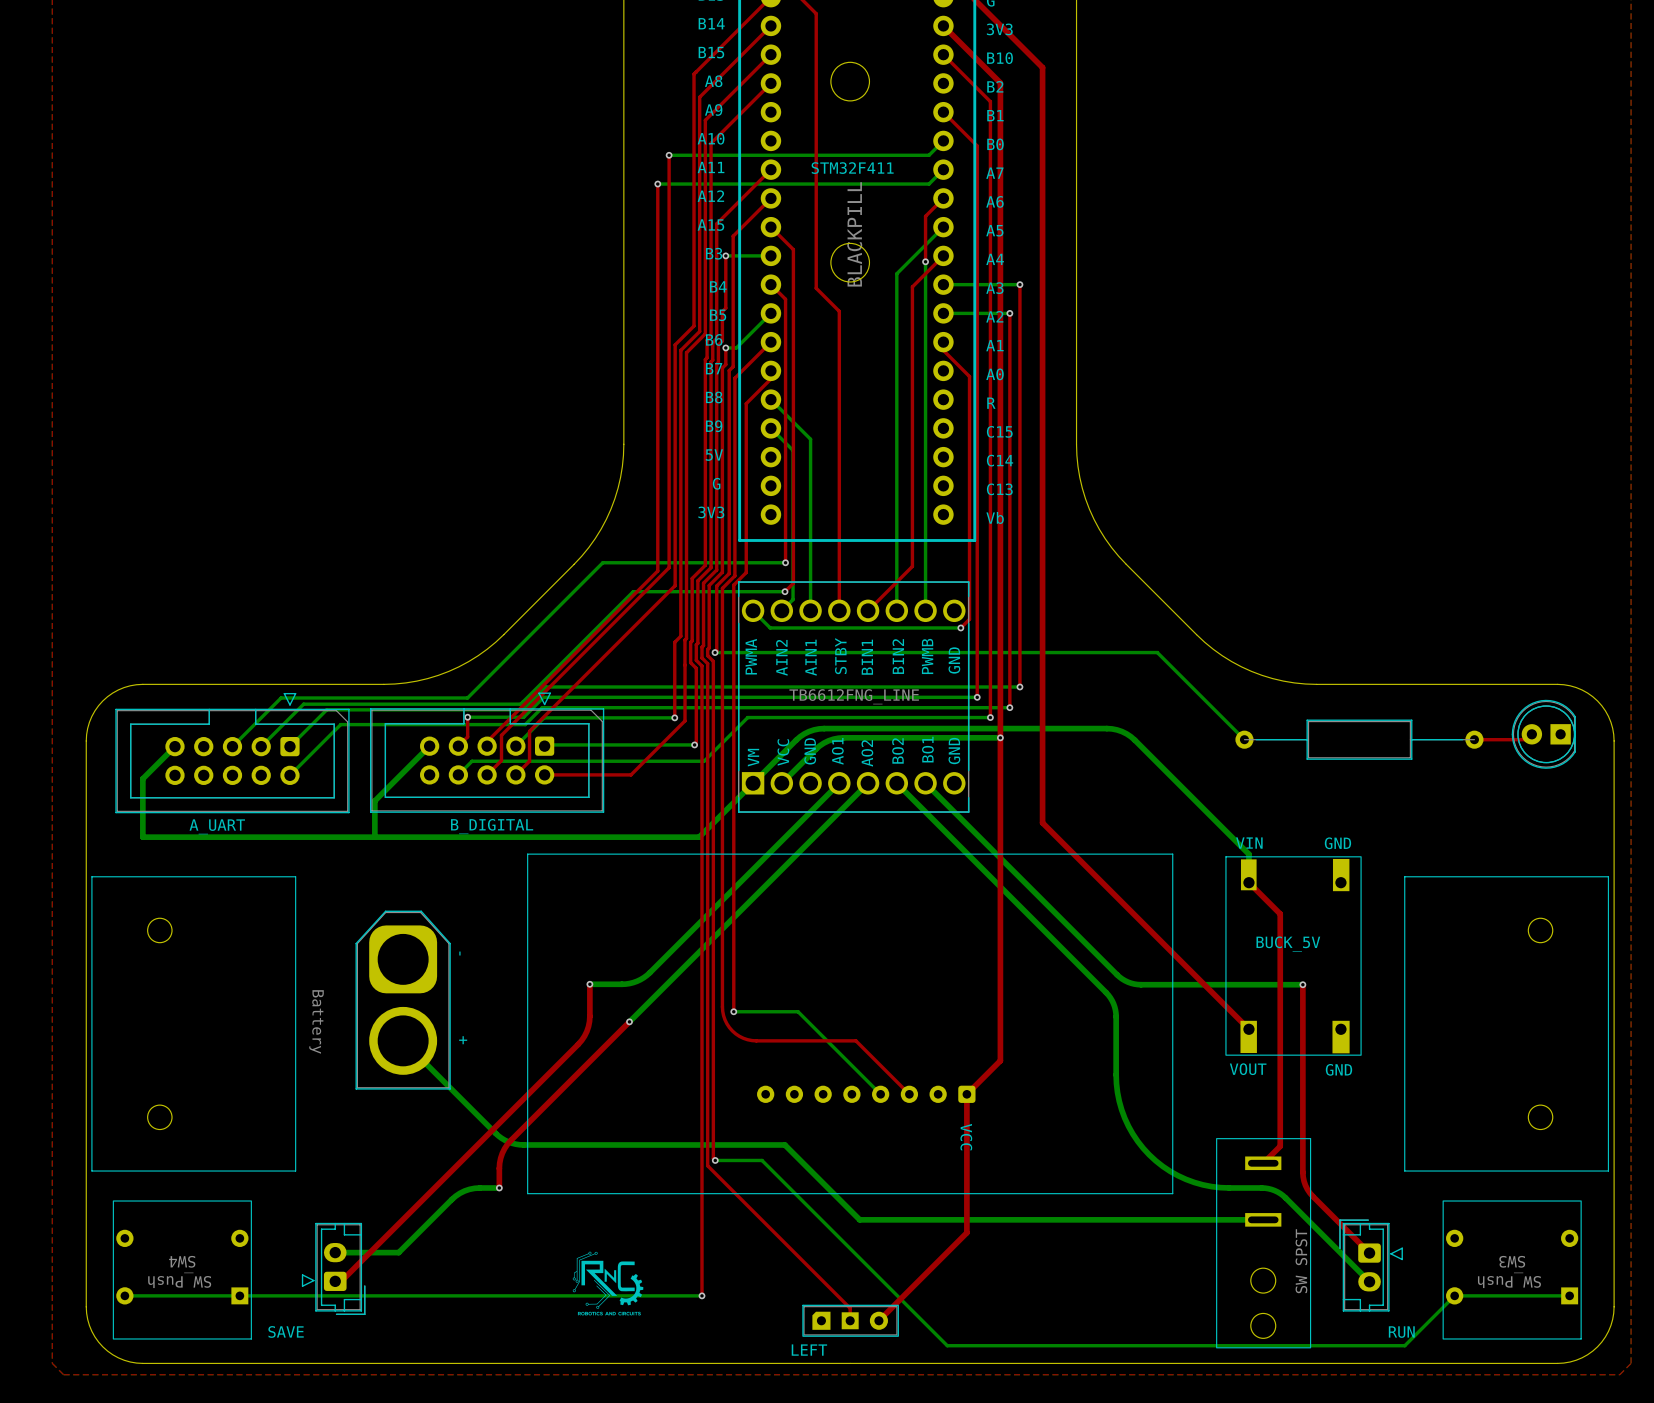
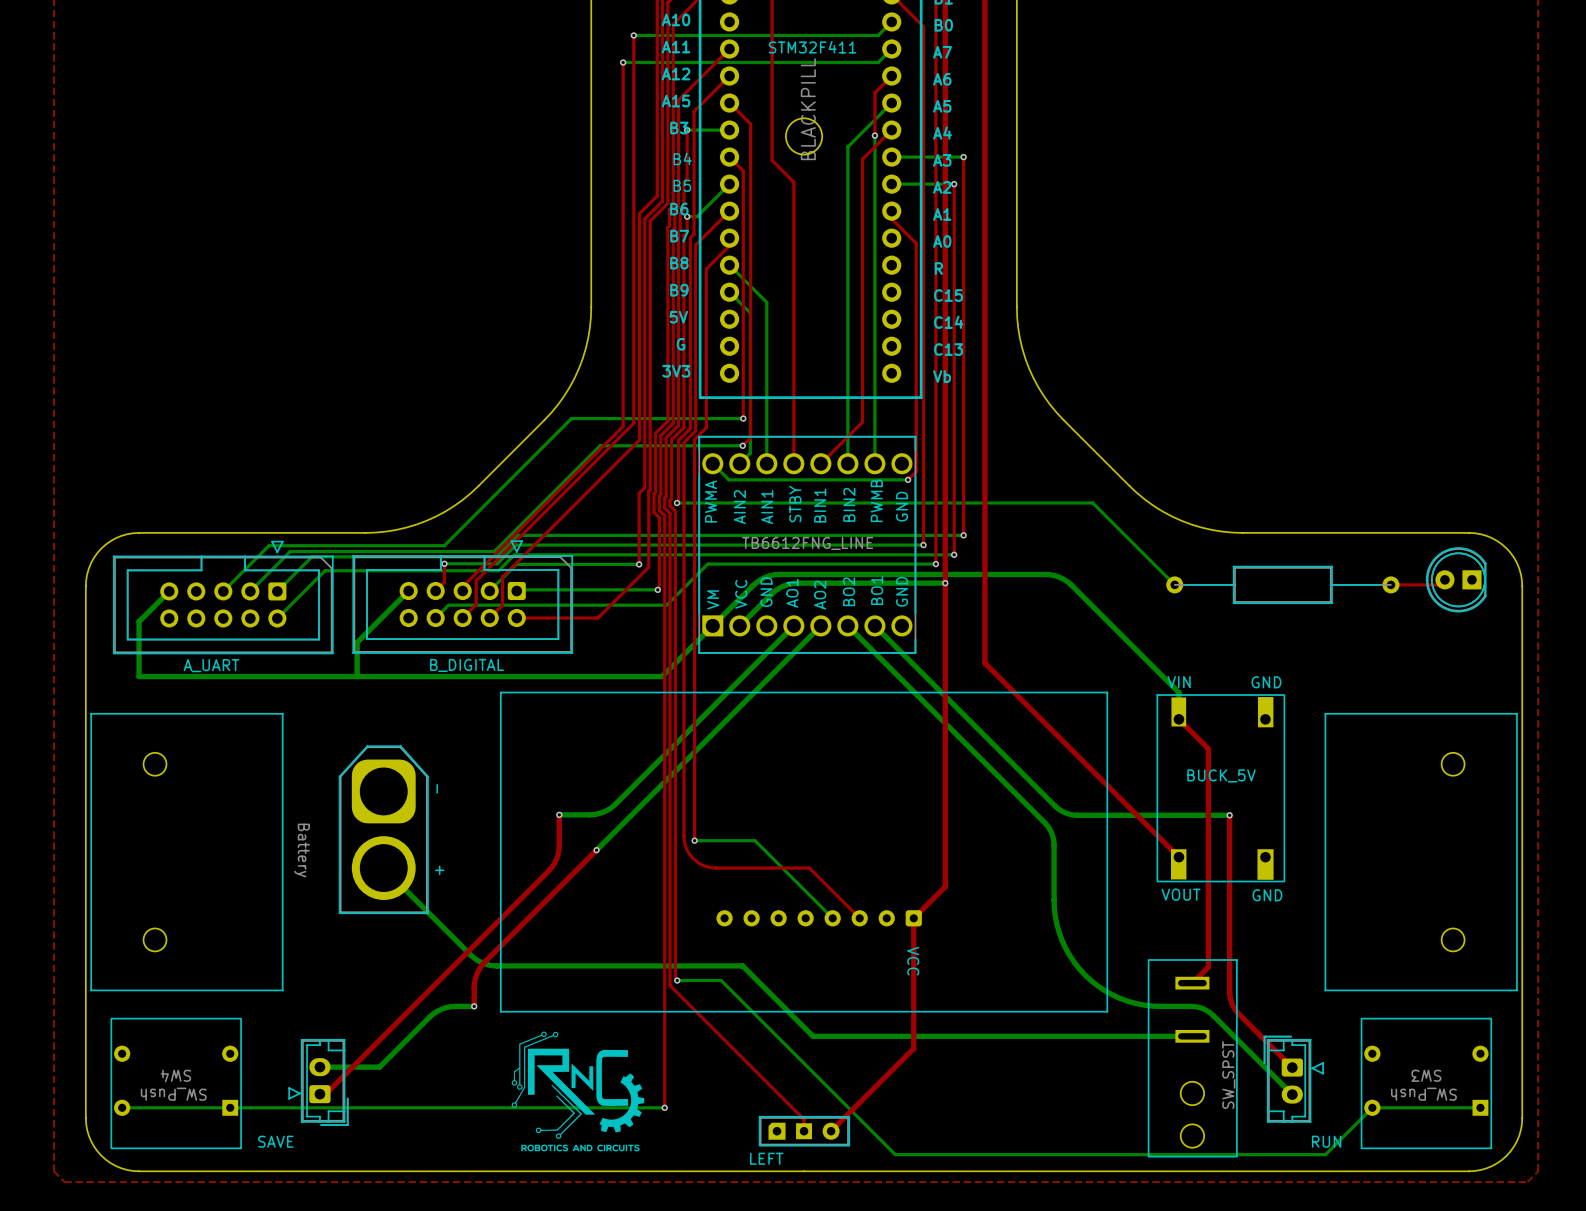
drawing shape: [572, 1251, 644, 1316] -> [511, 1031, 645, 1152]

